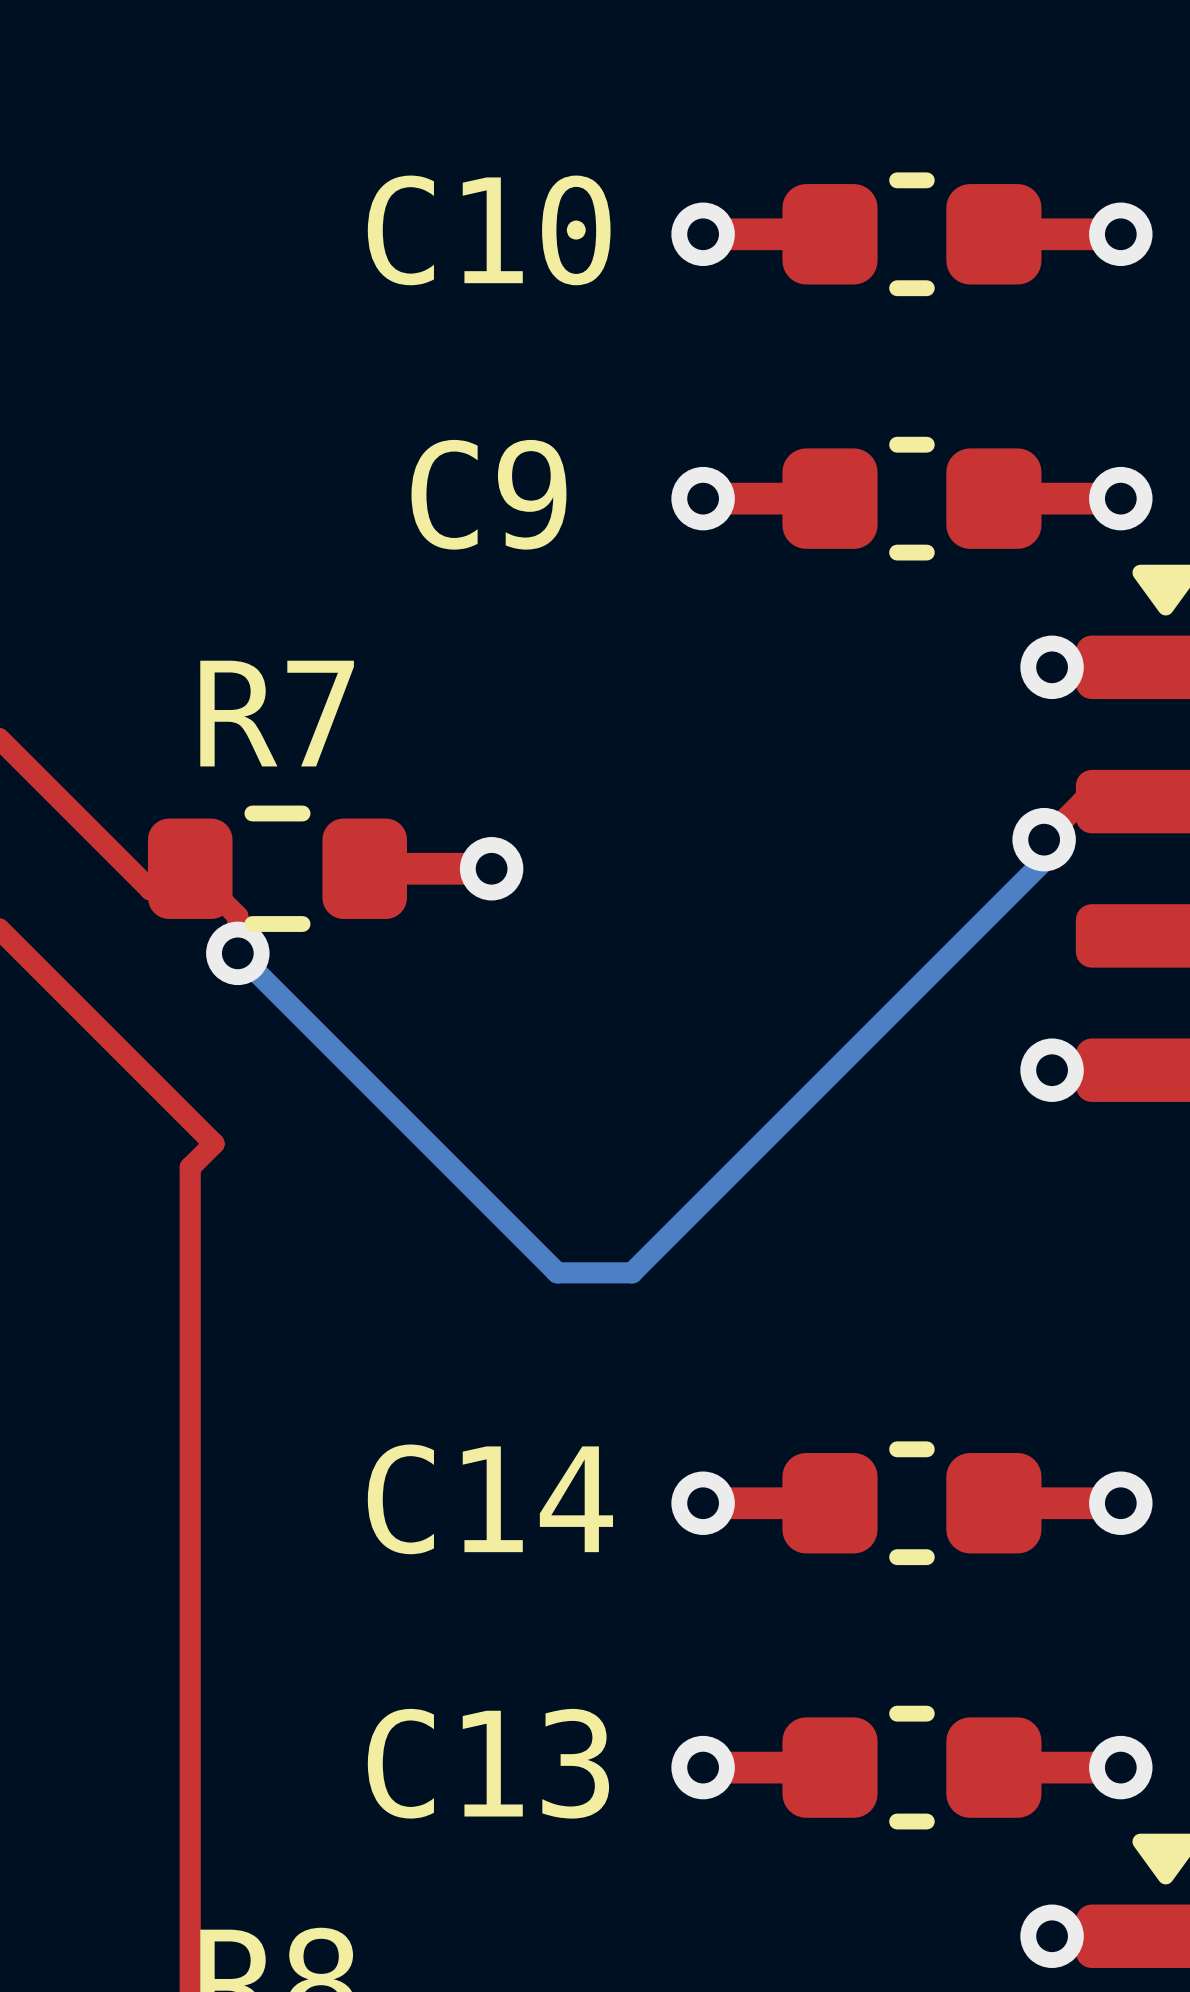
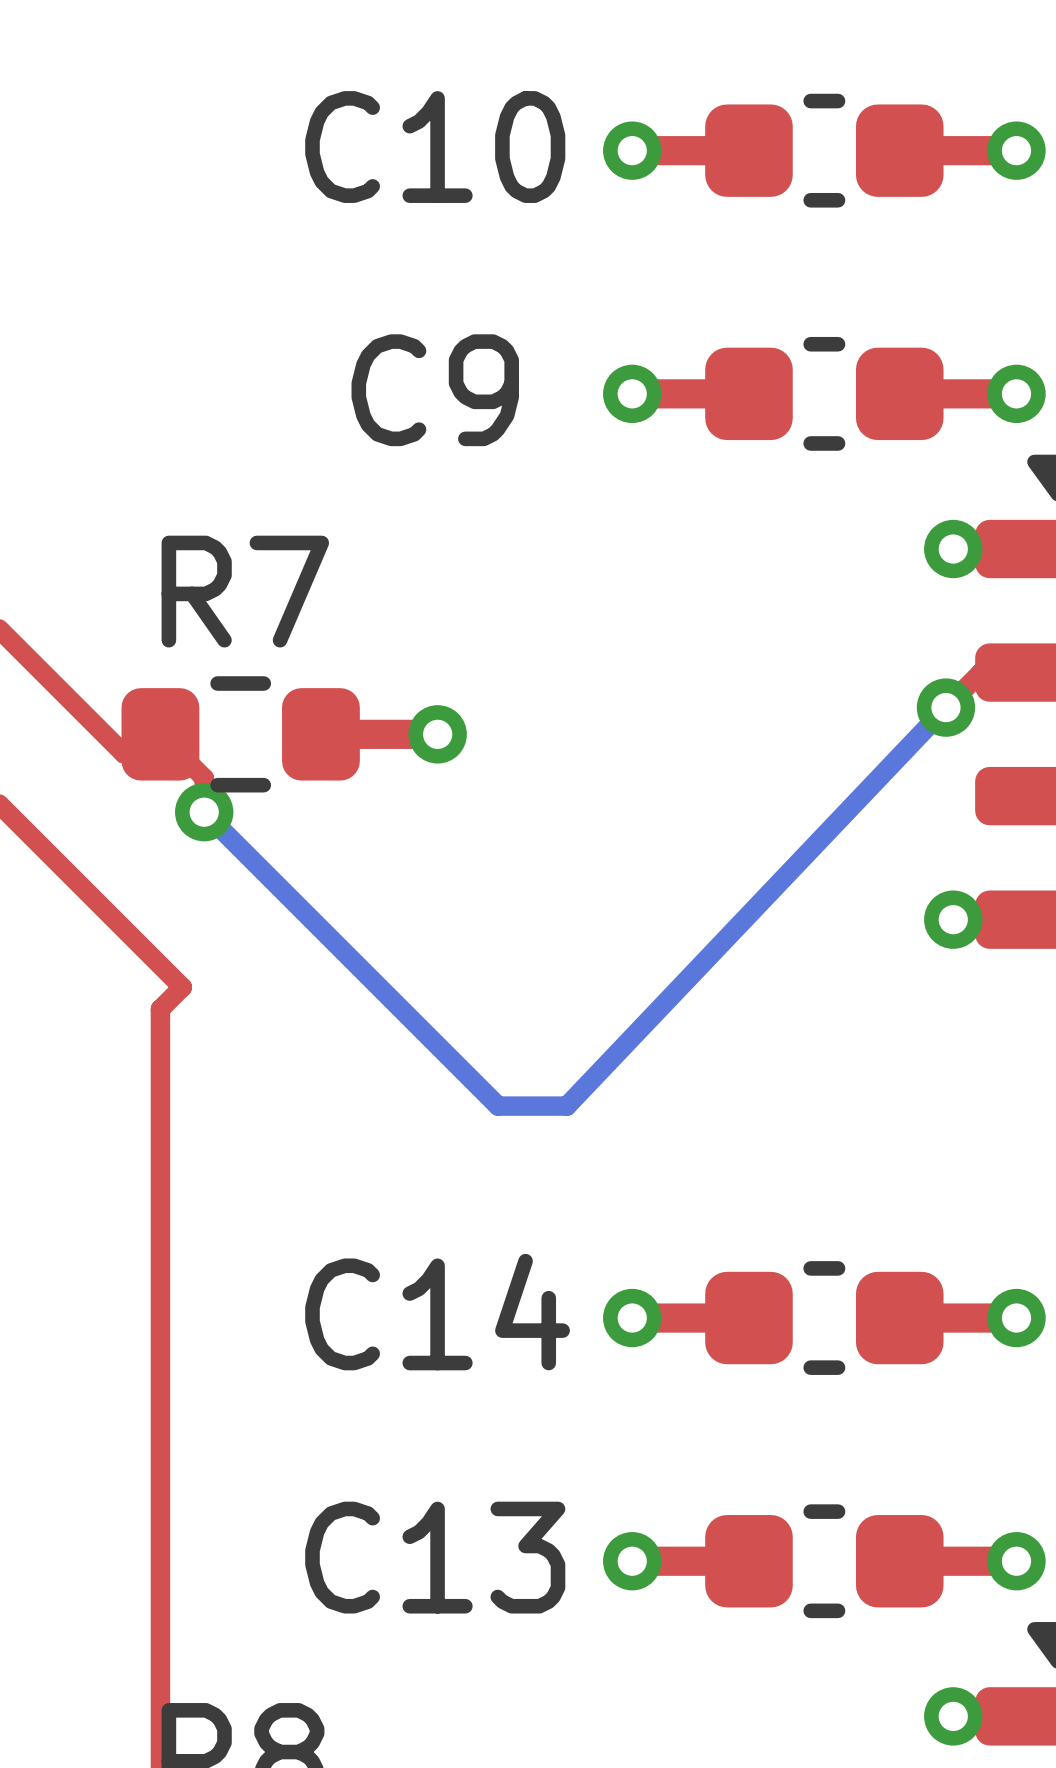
bottom track: (1044, 839) (1044, 860) (632, 1272) -> (945, 707) (566, 1106)

